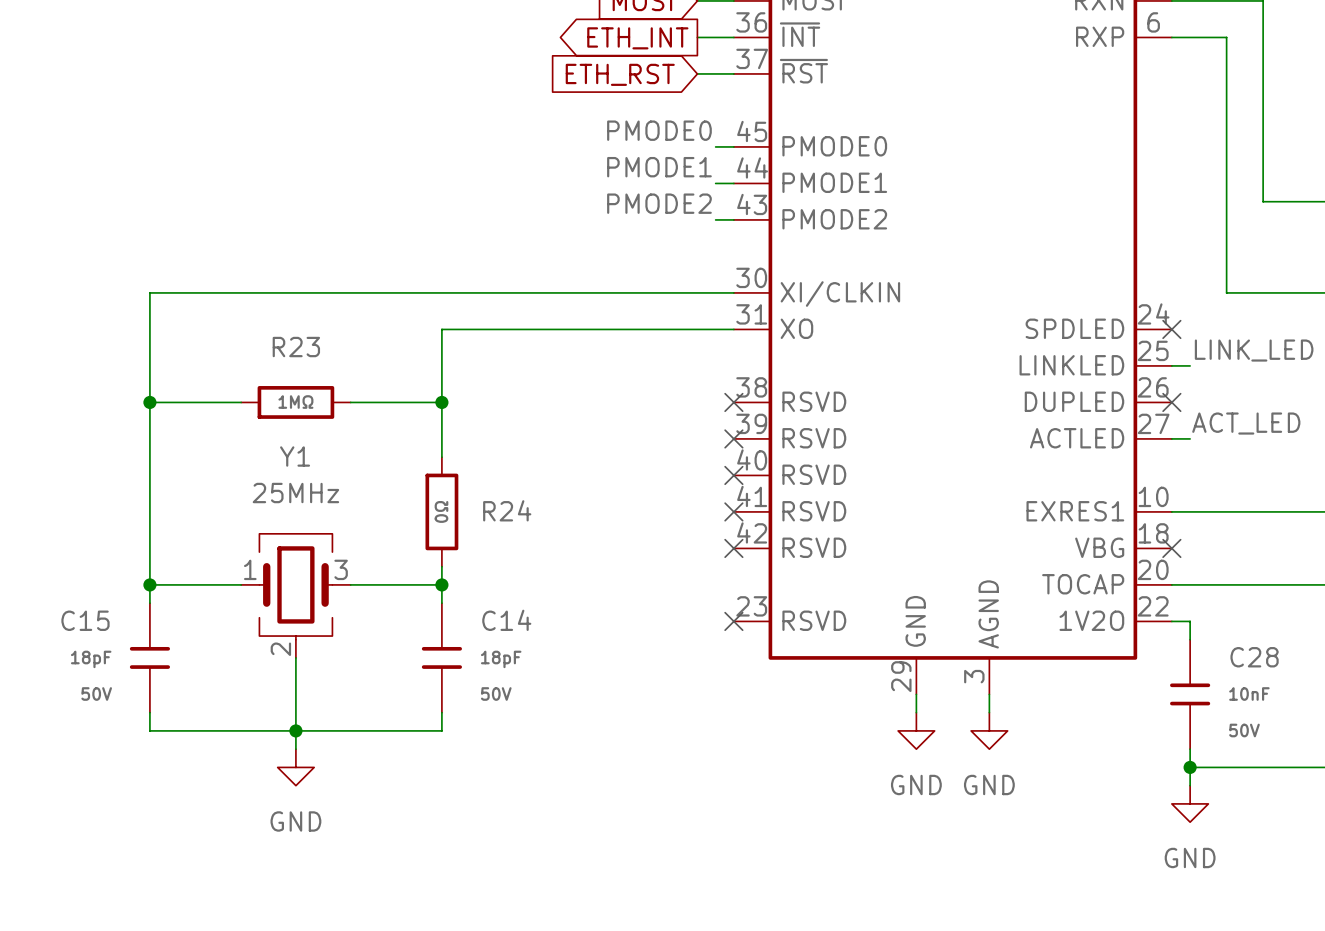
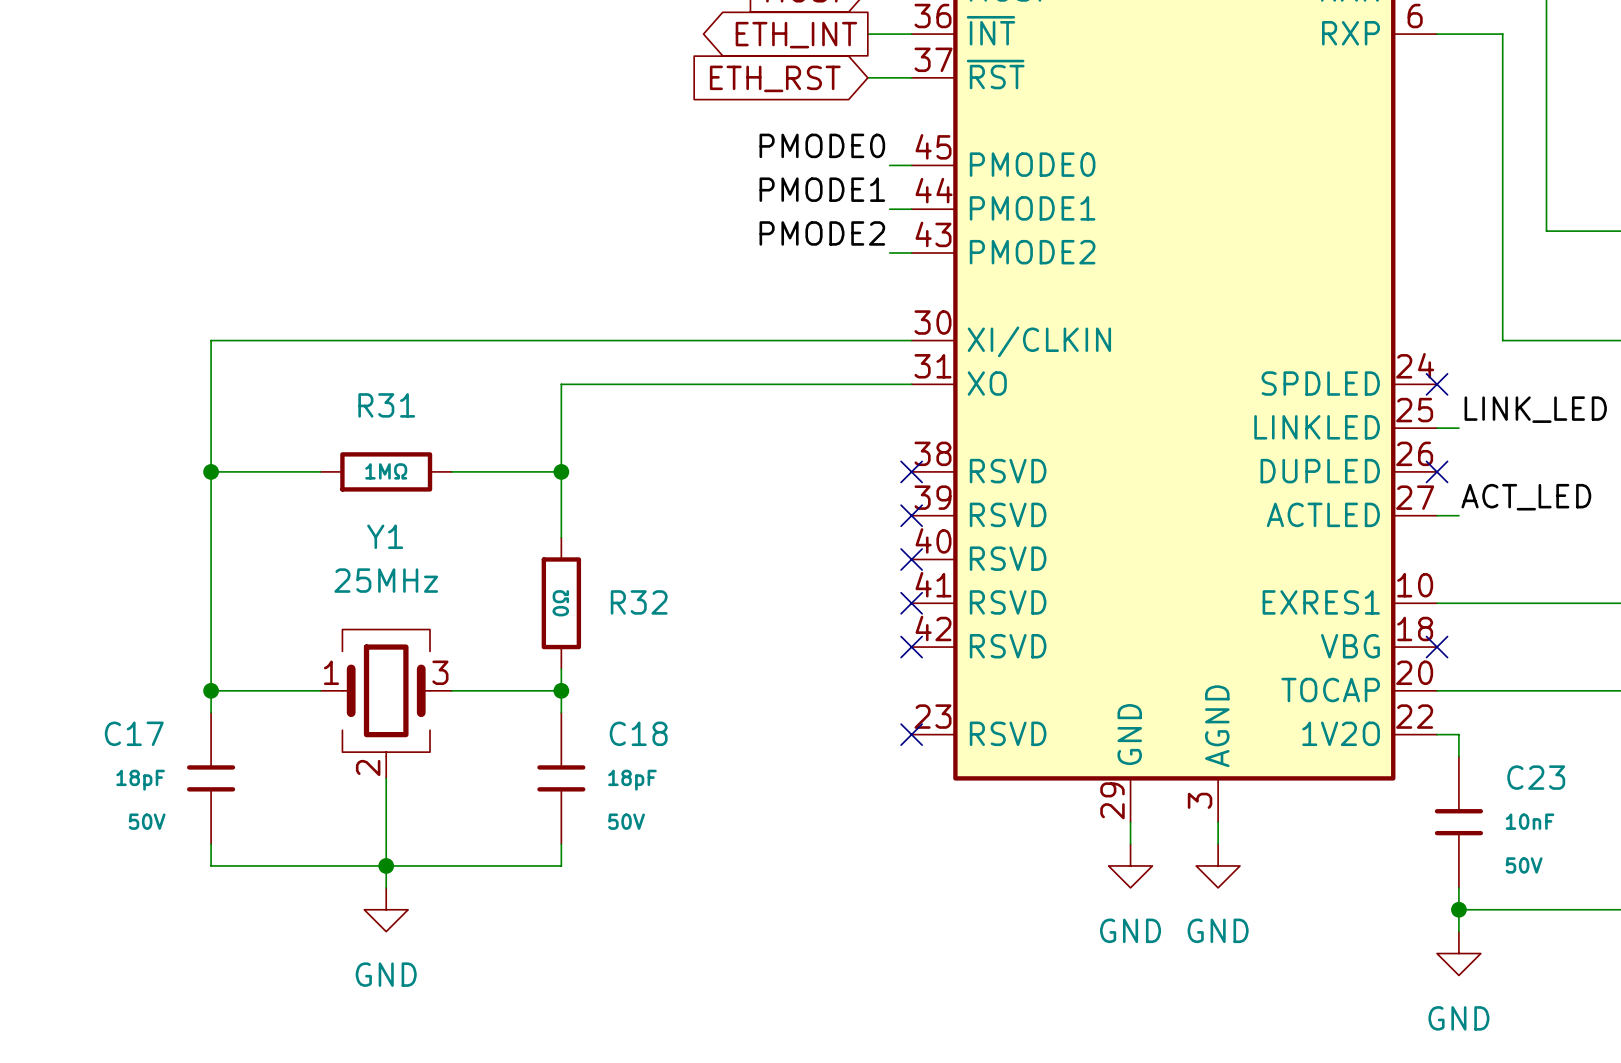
R23 name: R23 (296, 347) -> R31 (386, 405)
R24 name: R24 (507, 510) -> R32 (639, 602)
C15 name: C15 (85, 620) -> C17 (134, 733)
C14 name: C14 (506, 620) -> C18 (638, 733)
C28 name: C28 (1254, 657) -> C23 (1536, 777)

